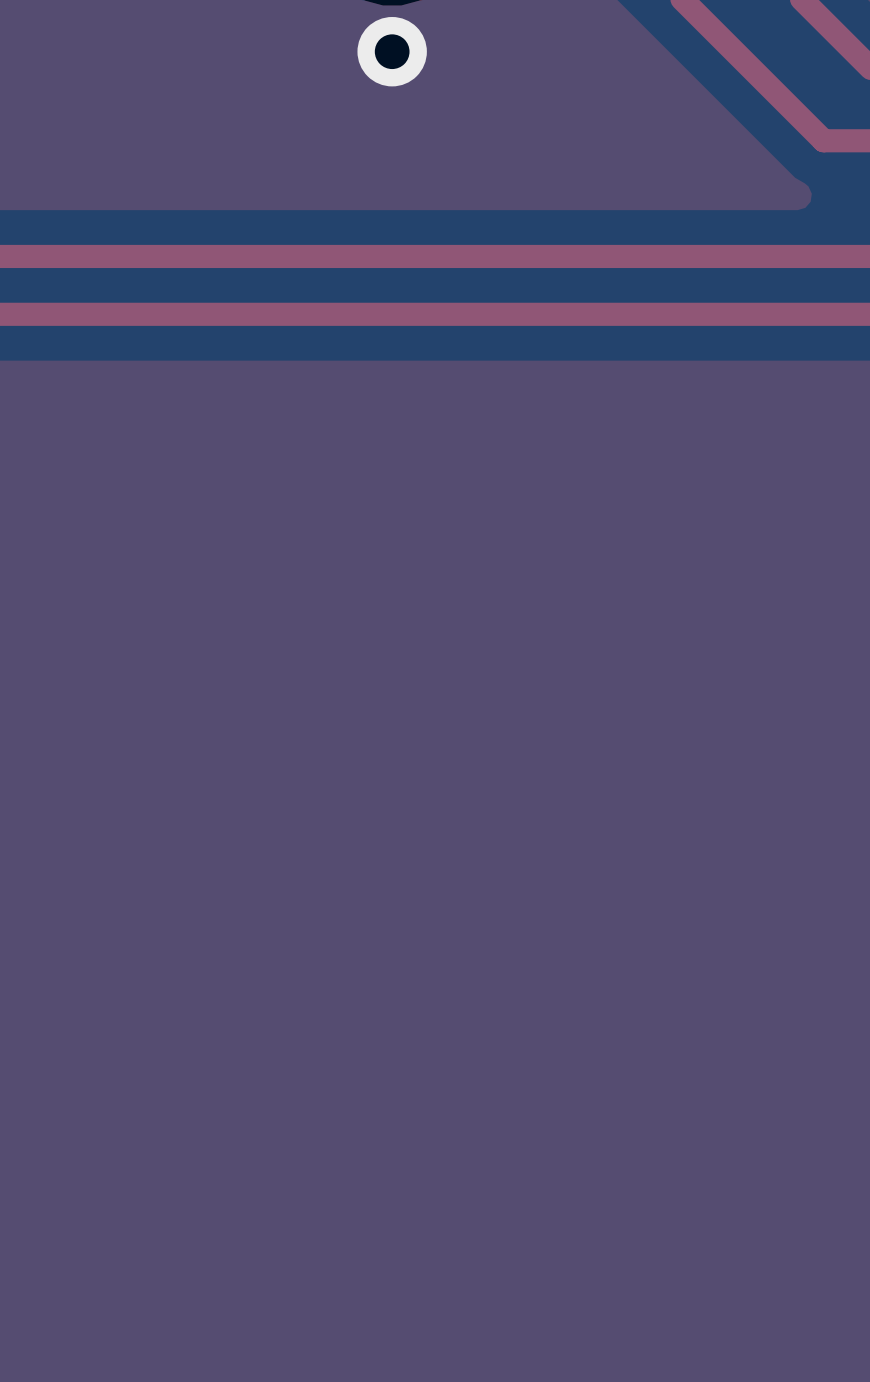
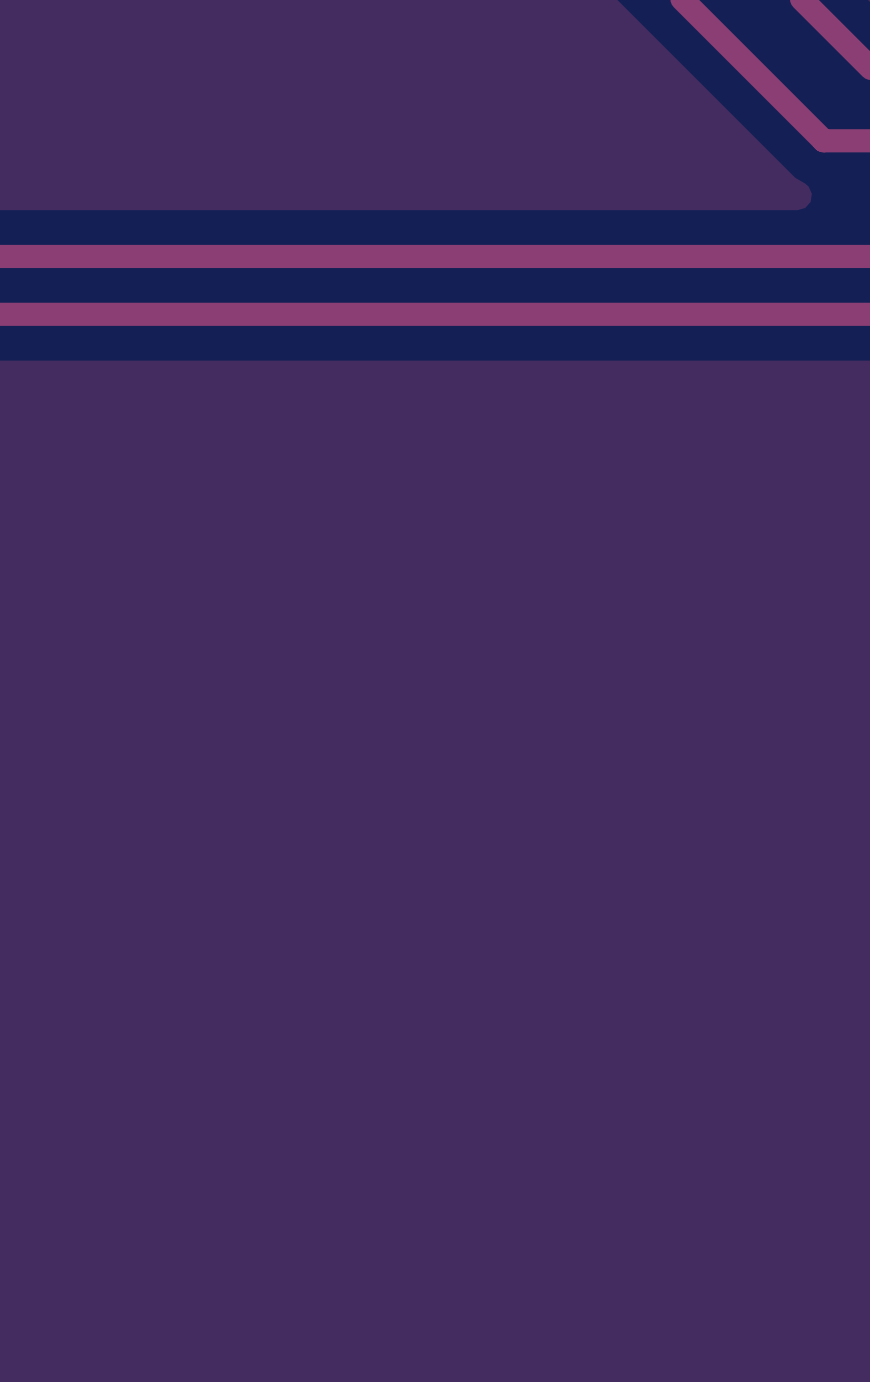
via: (392, 51) -> none

